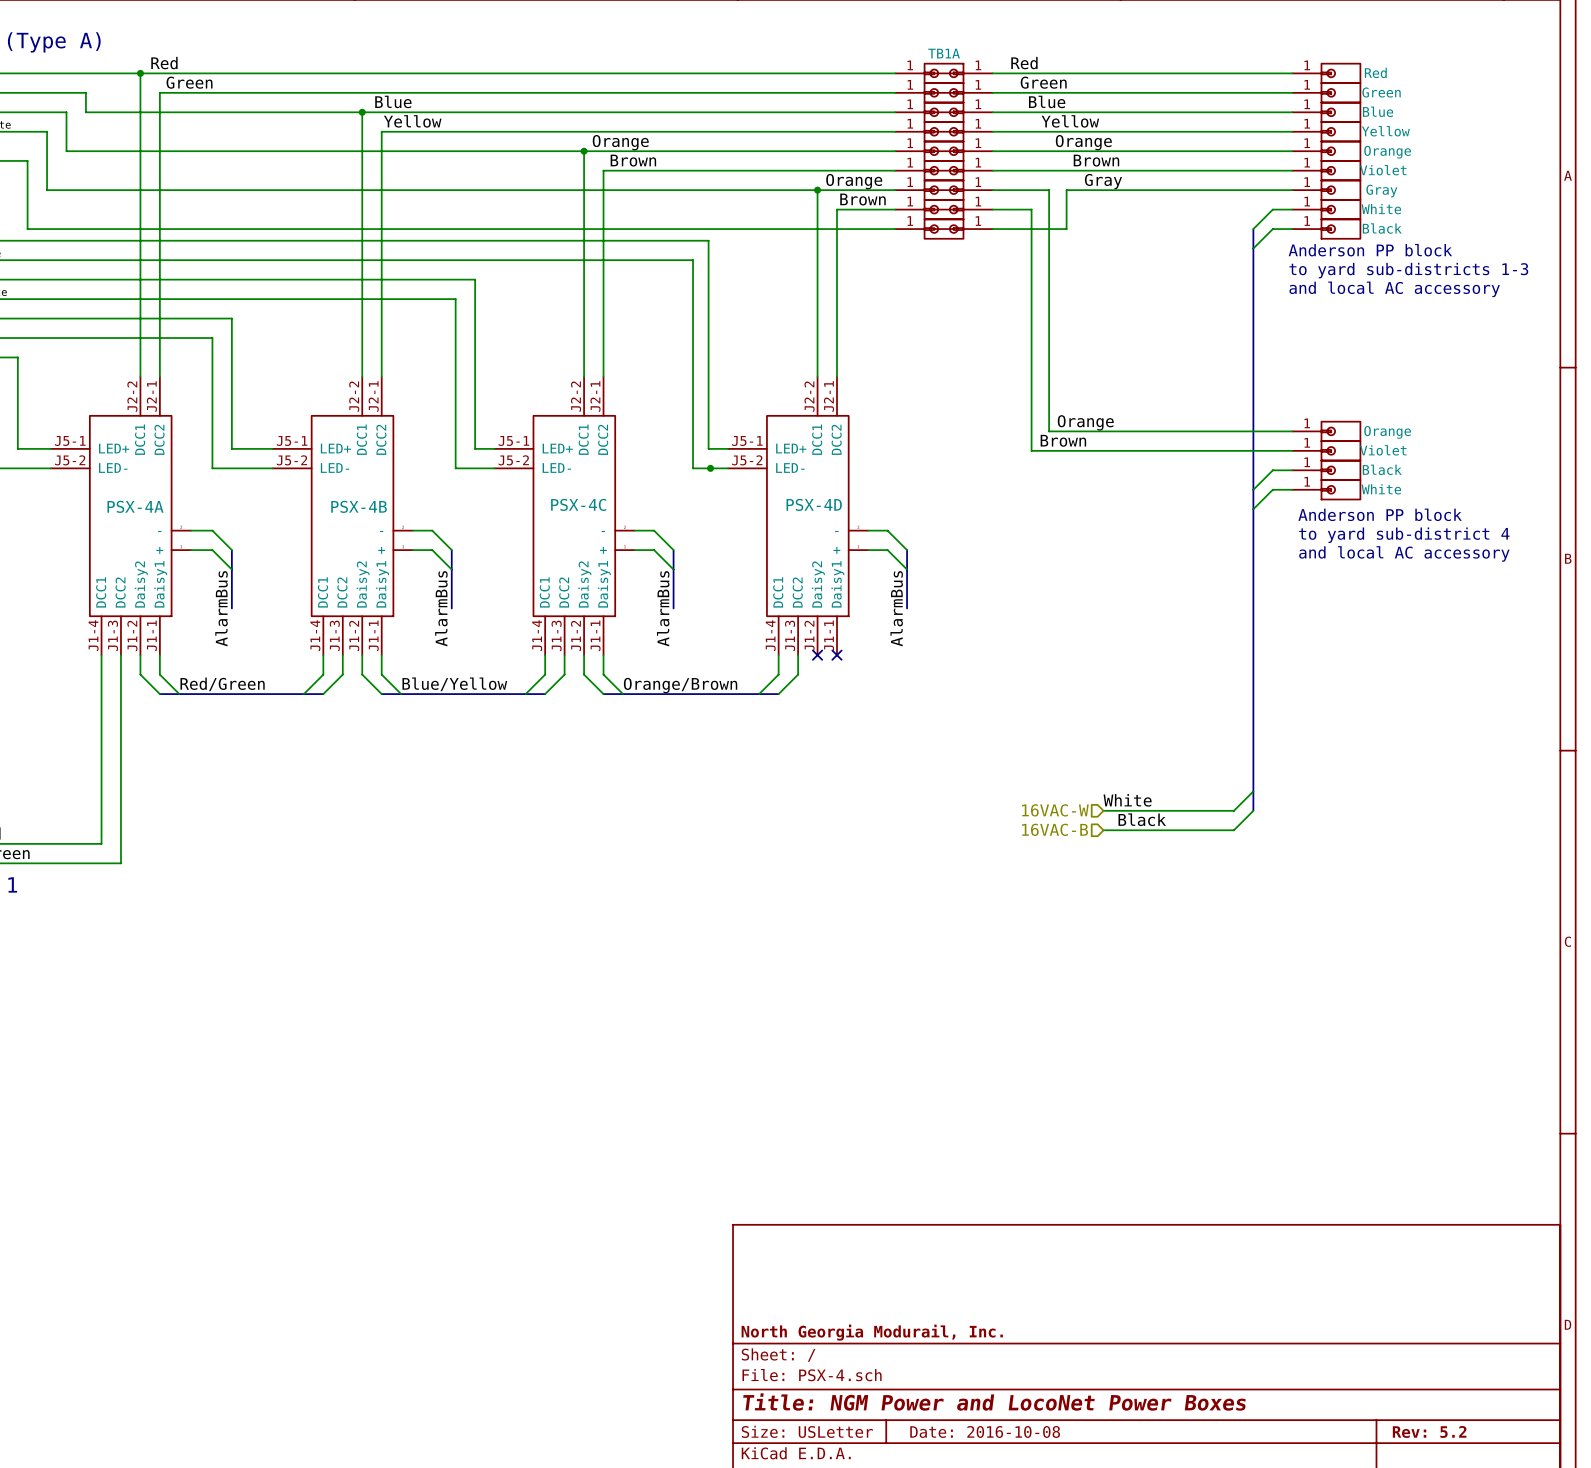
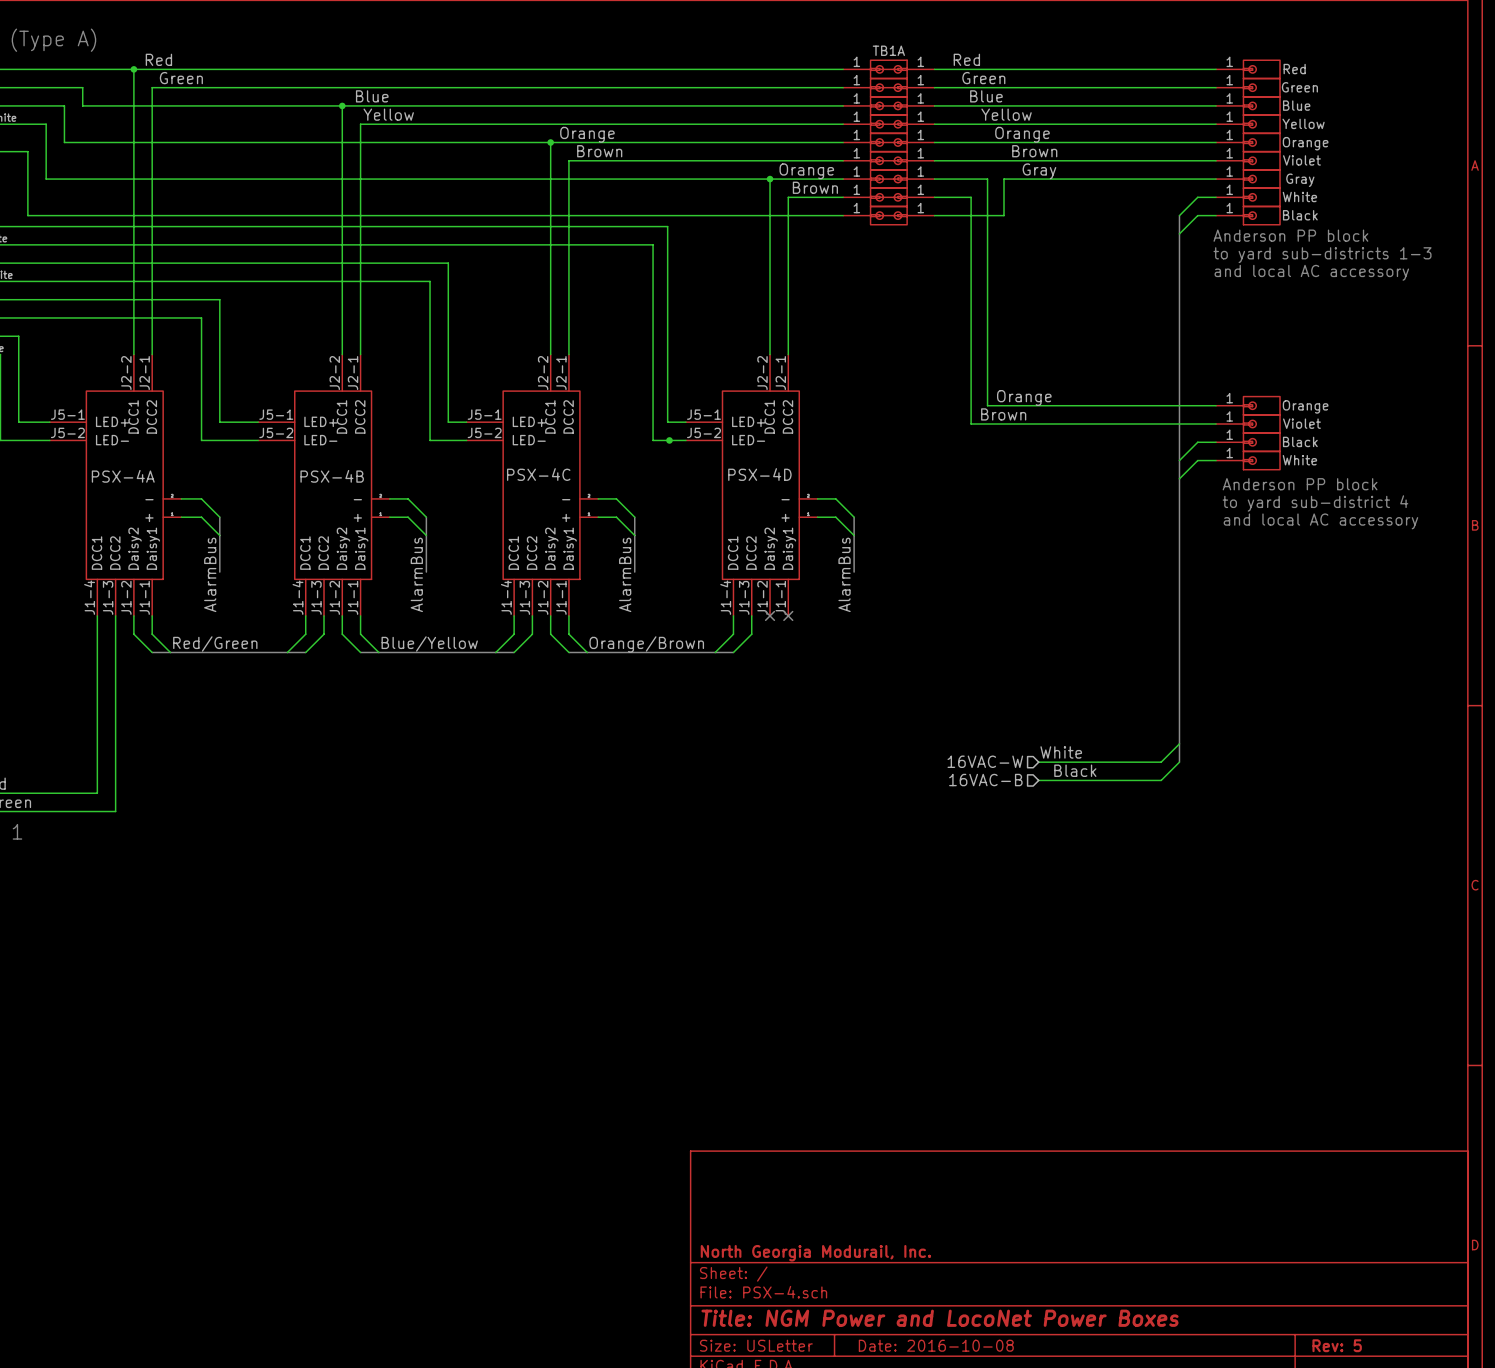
title block: Rev: 5.2 (1429, 1431) -> Rev: 5 (1337, 1345)

